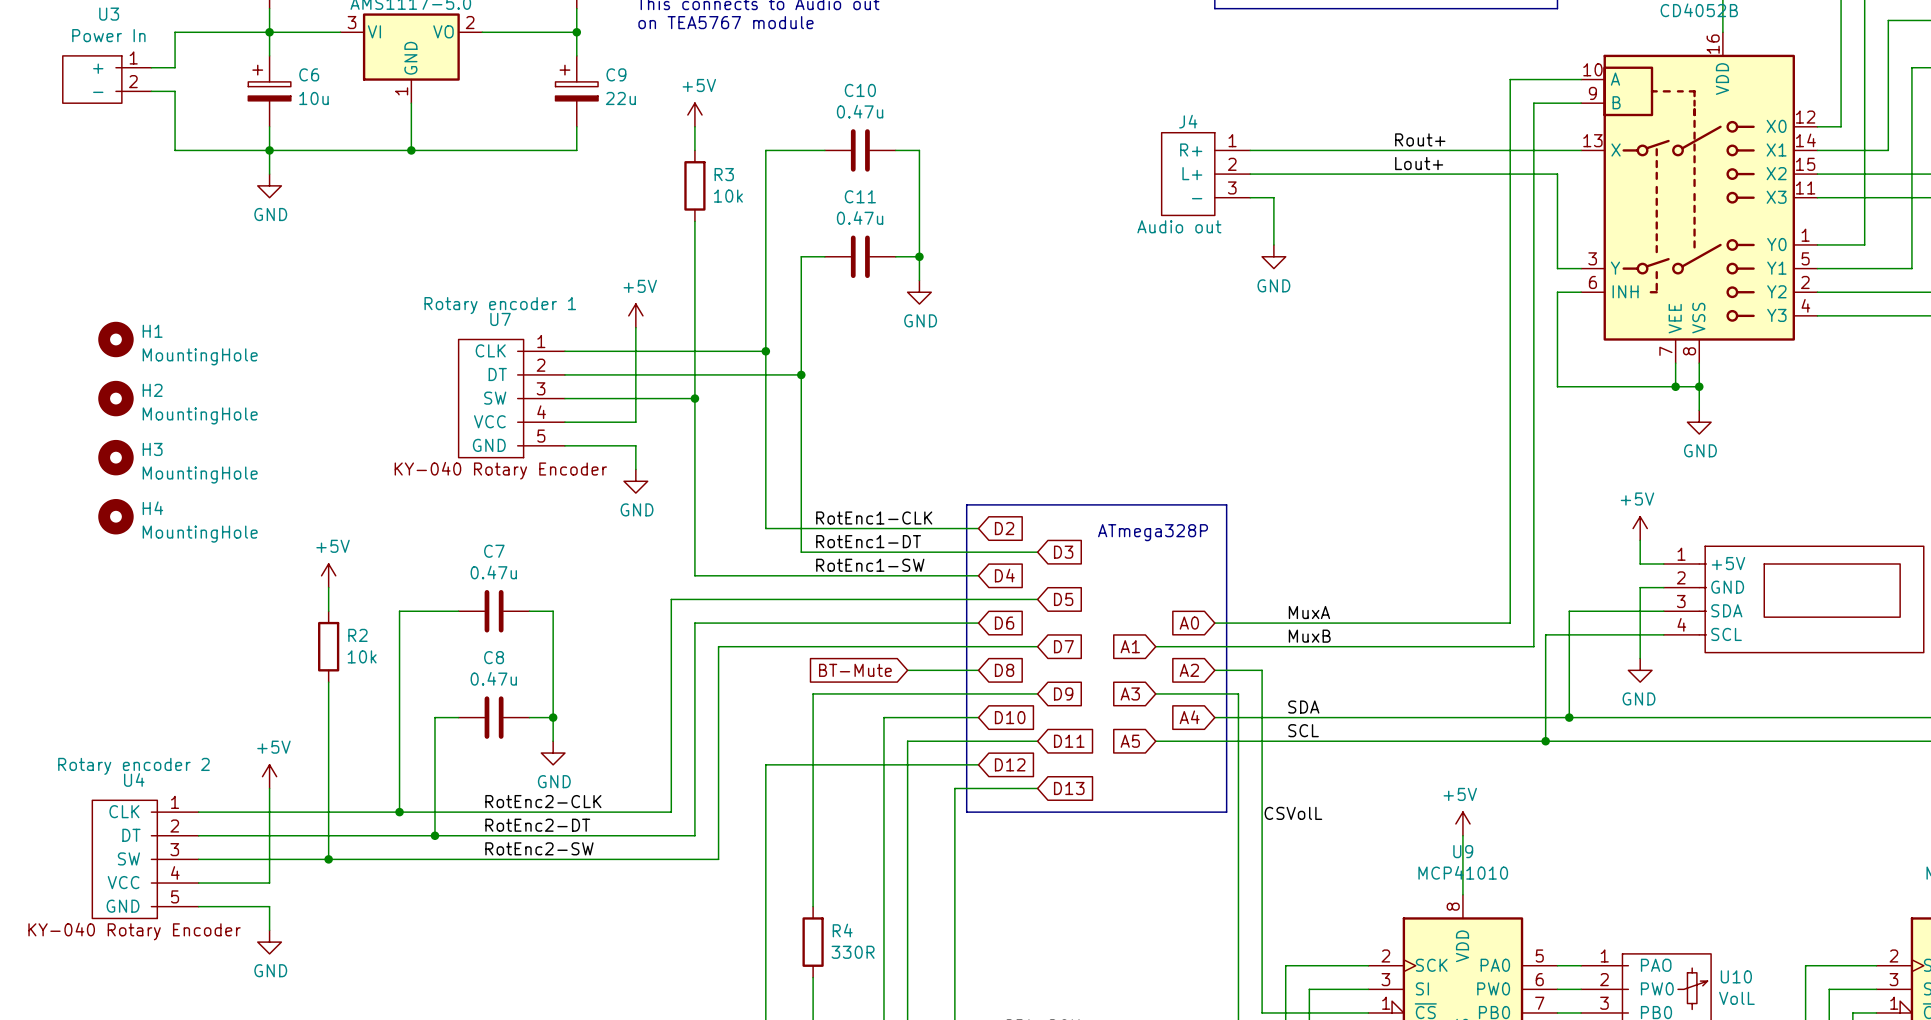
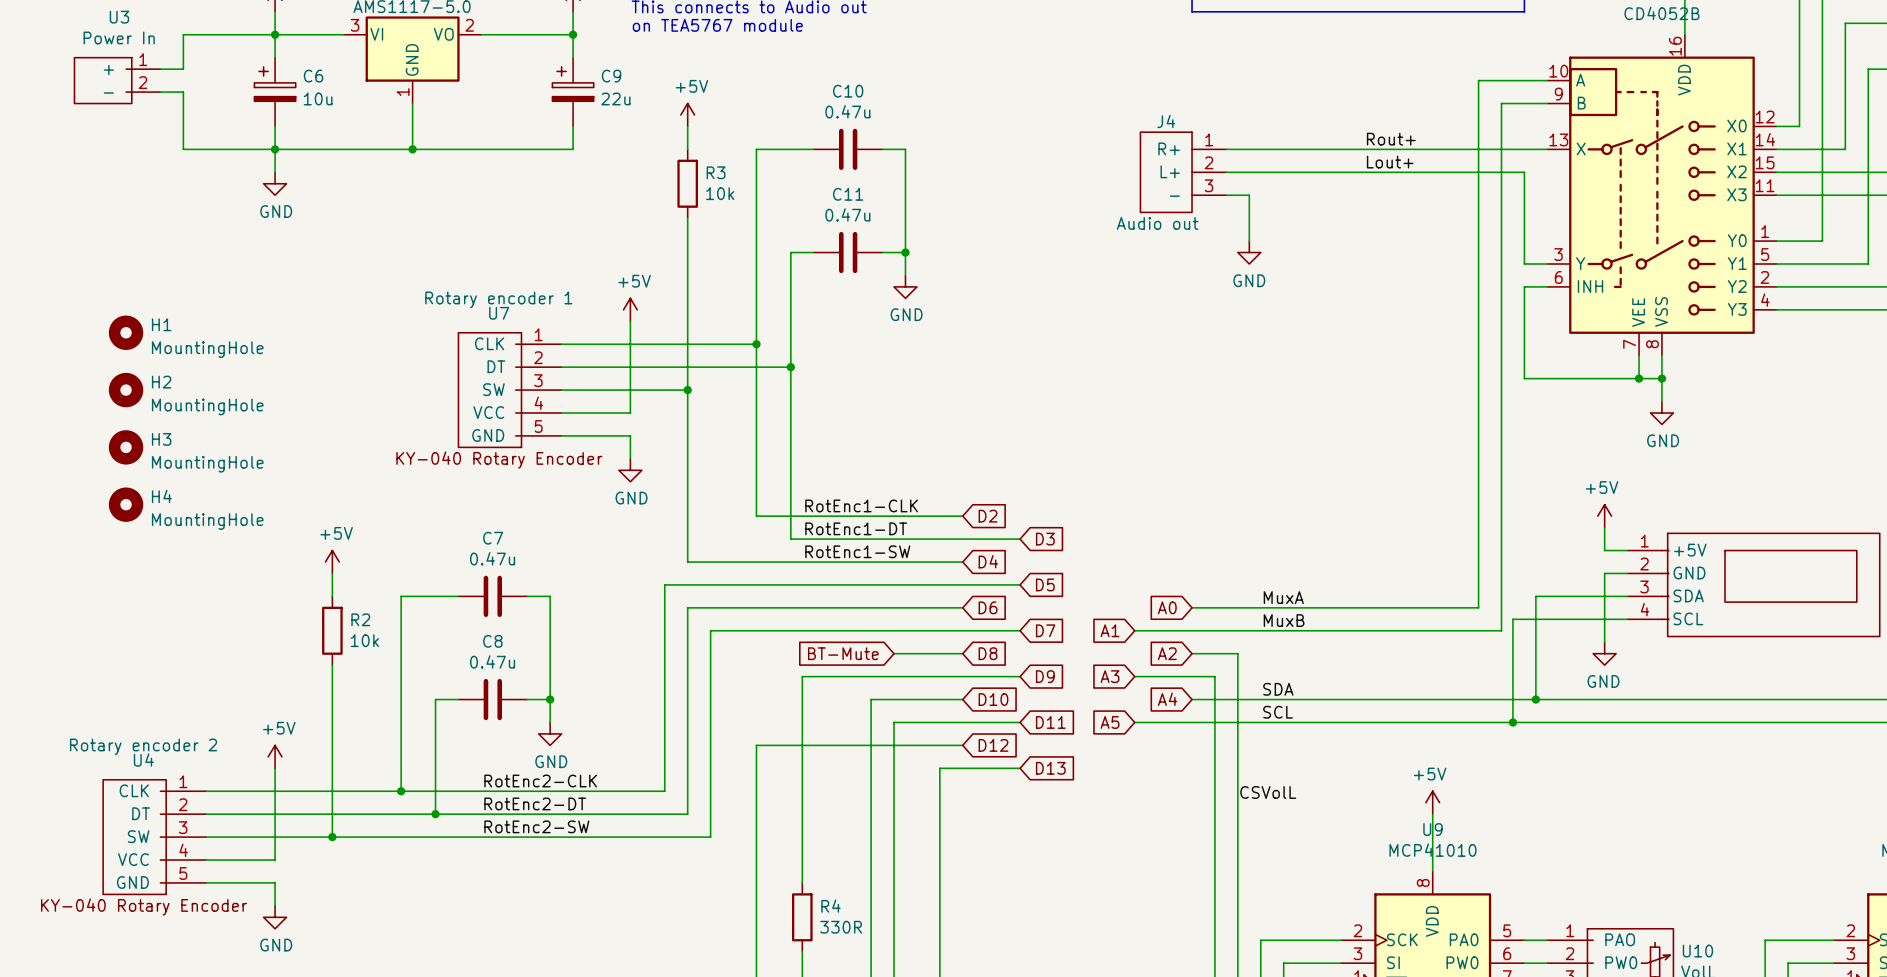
line: (966, 504) (1226, 504) (1226, 812) (966, 812) (966, 504) -> none
text: ATmega328P (1153, 532) -> none

